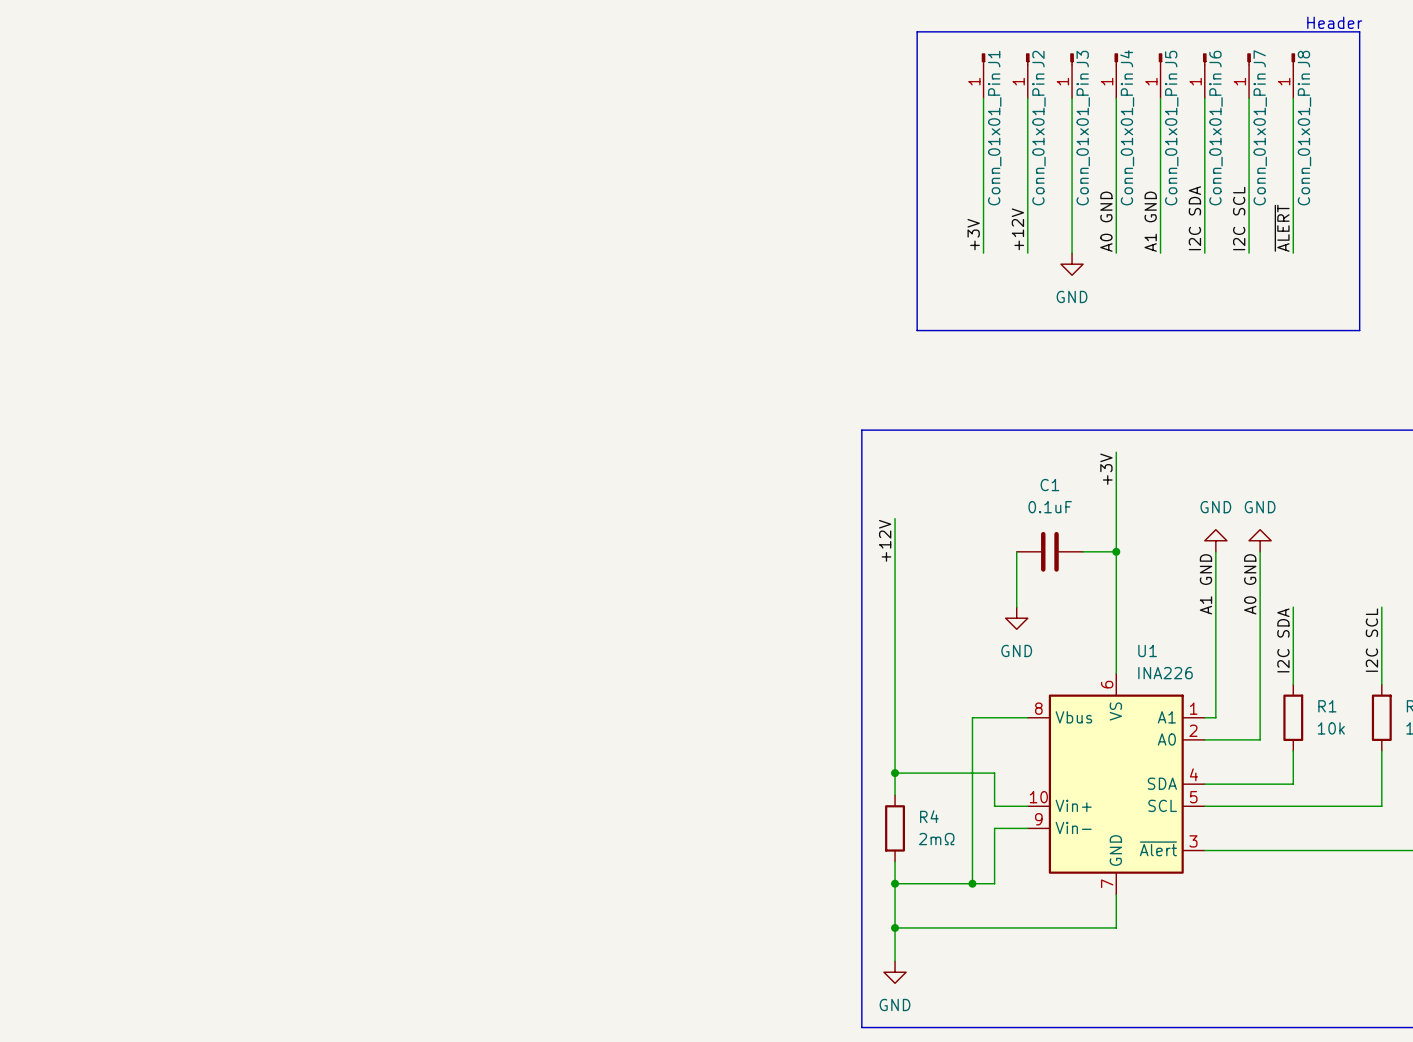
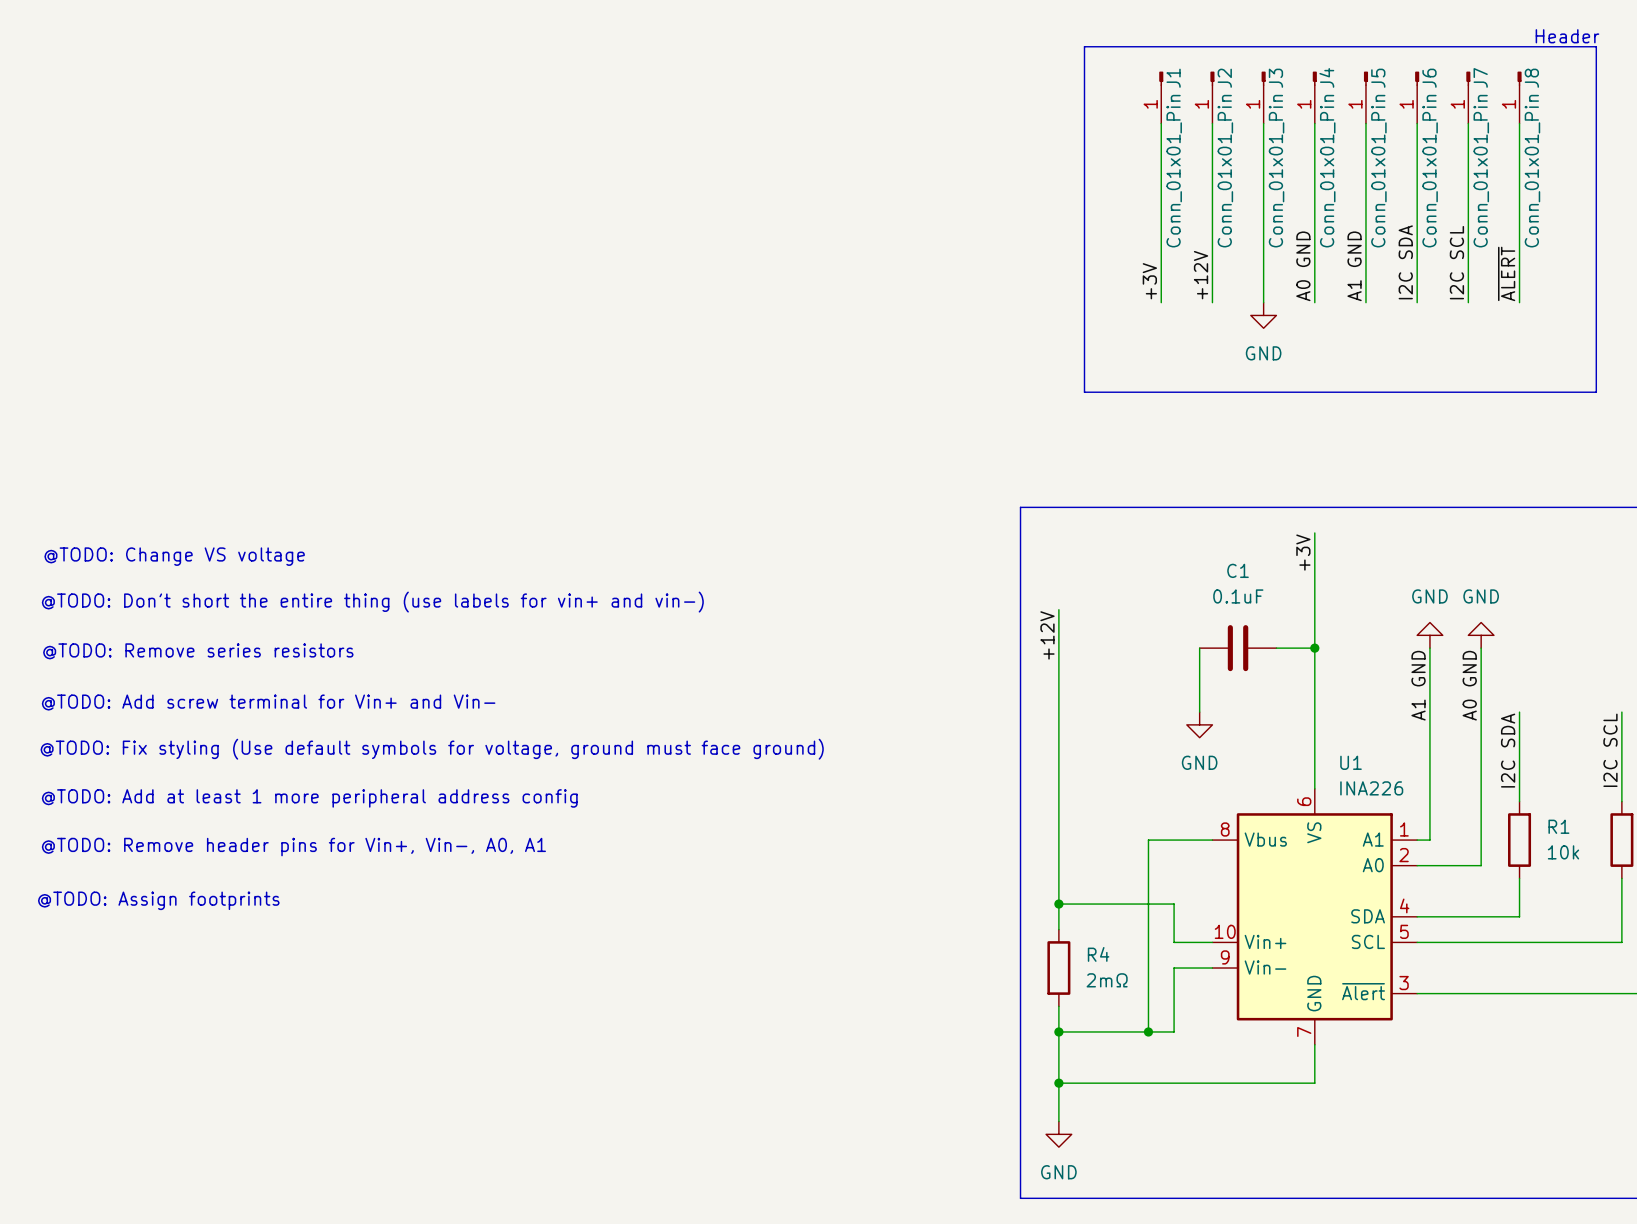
text: none -> @TODO: Change VS voltage (174, 556)
text: none -> @TODO: Don't short the entire thing (use labels for vin+ and vin-) (372, 602)
text: none -> @TODO: Remove series resistors (198, 651)
text: none -> @TODO: Add screw terminal for Vin+ and Vin- (268, 702)
text: none -> @TODO: Fix styling (Use default symbols for voltage, ground must face ground) (432, 749)
text: none -> @TODO: Add at least 1 more peripheral address config (309, 798)
text: none -> @TODO: Remove header pins for Vin+, Vin-, A0, A1 (293, 847)
text: none -> @TODO: Assign footprints (158, 900)

